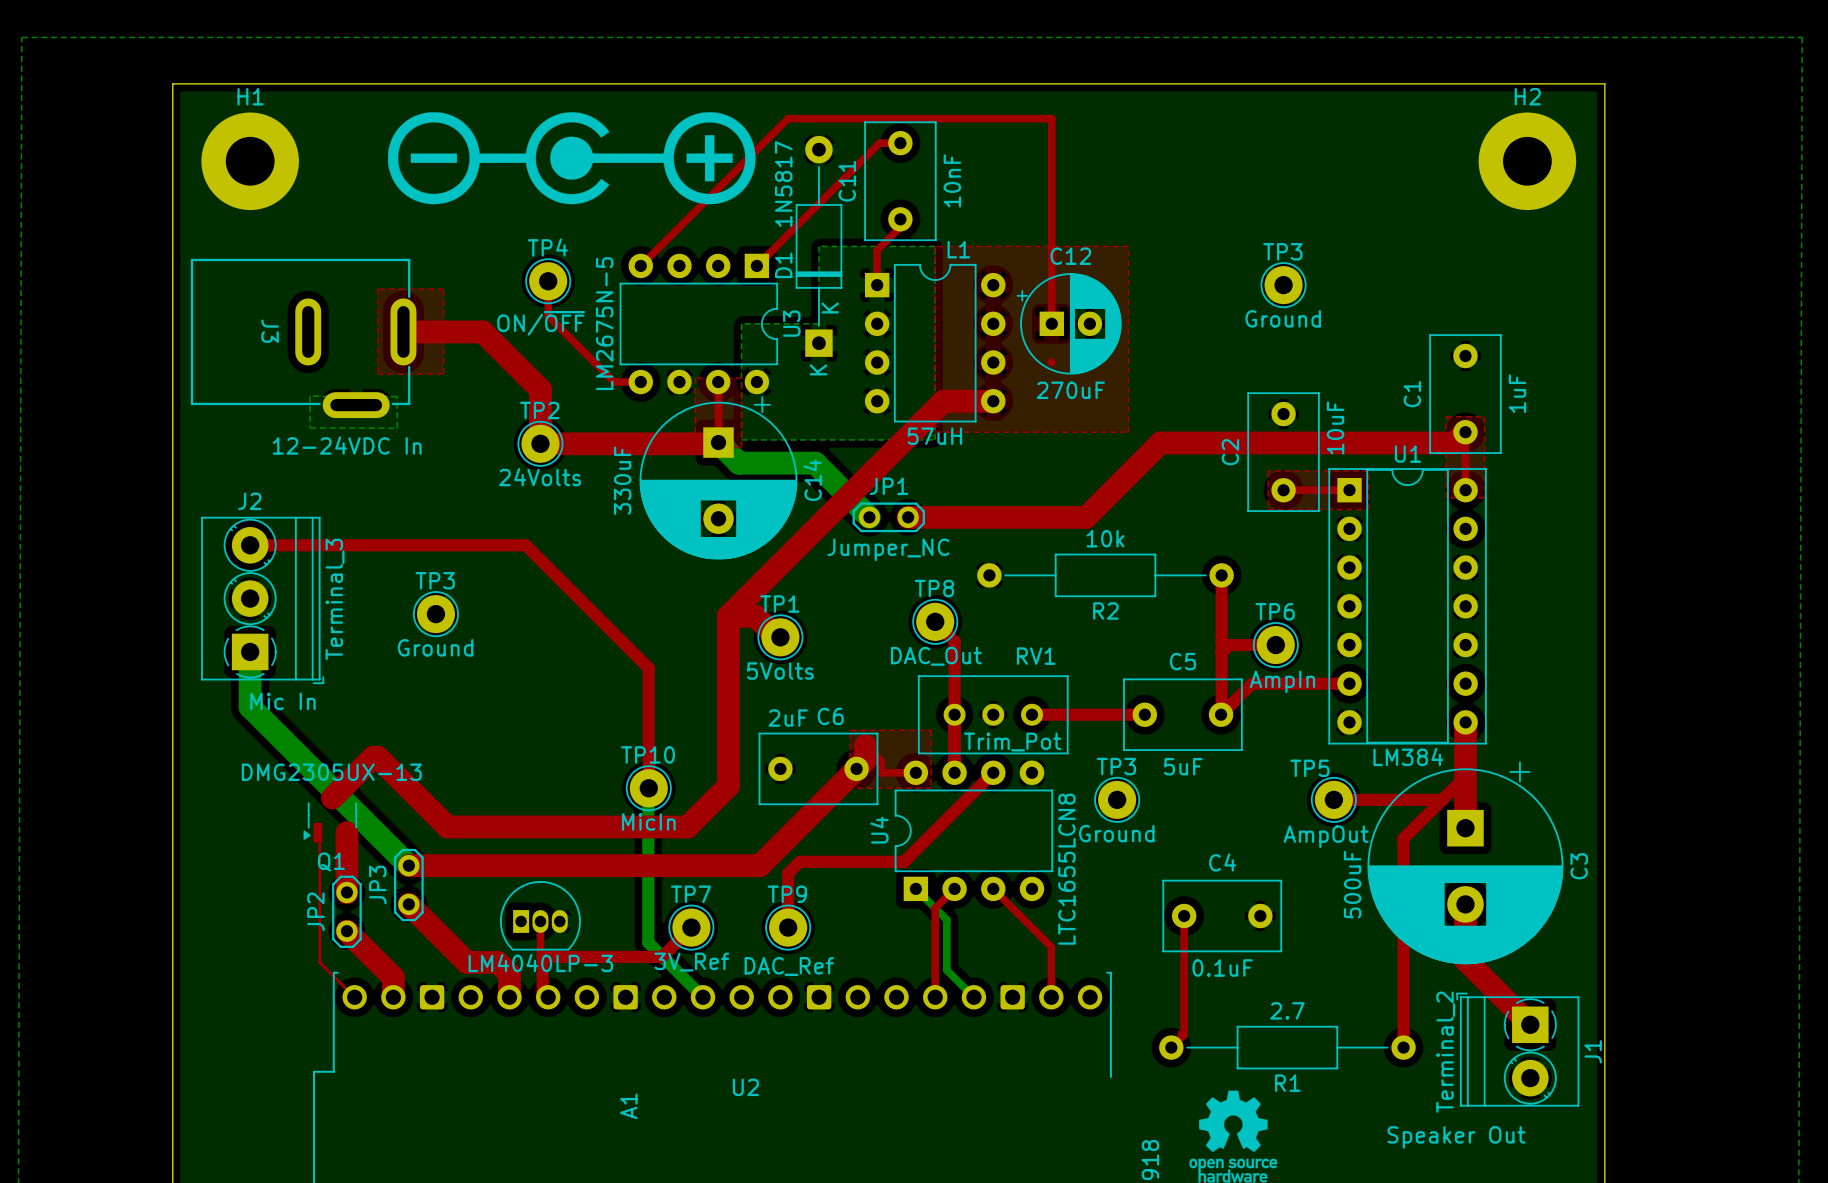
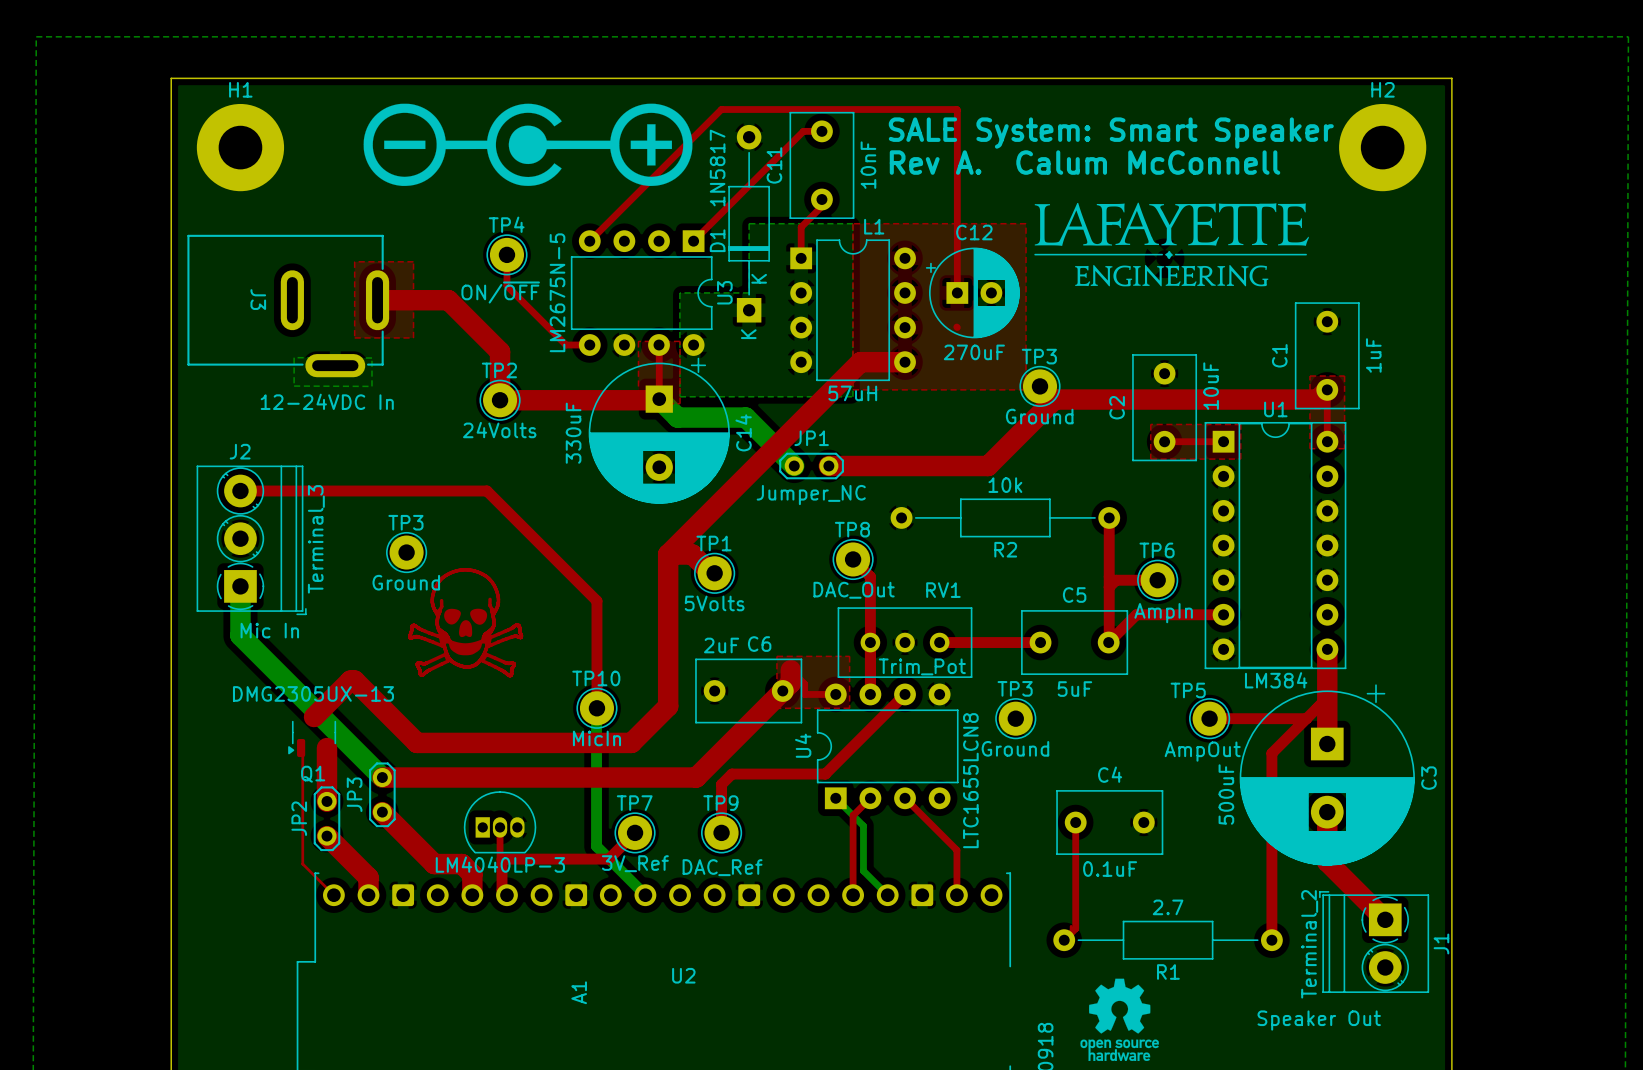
text: none -> SALE System: Smart Speaker (1111, 133)
text: none -> Rev A. Calum McConnell (1085, 162)
drawing: none -> [1034, 202, 1309, 287]
TP3 position: (1283, 285) -> (1040, 386)
drawing: none -> [408, 568, 524, 678]

